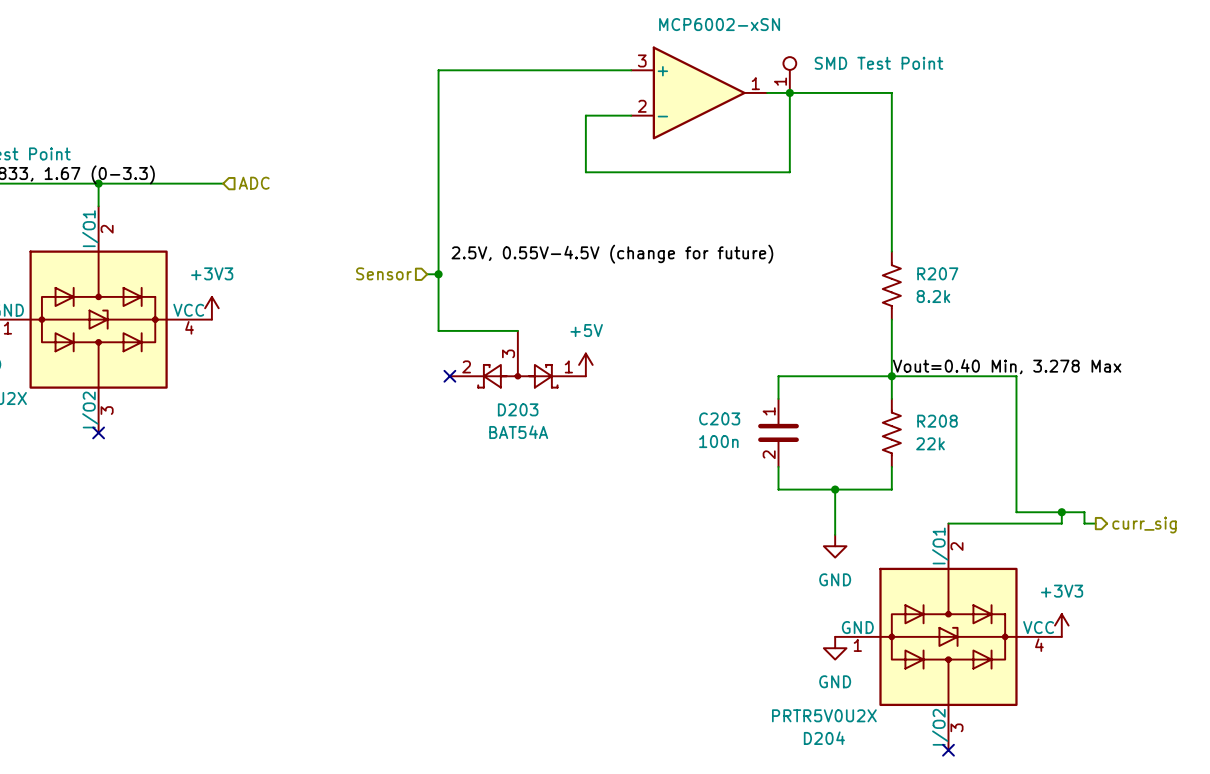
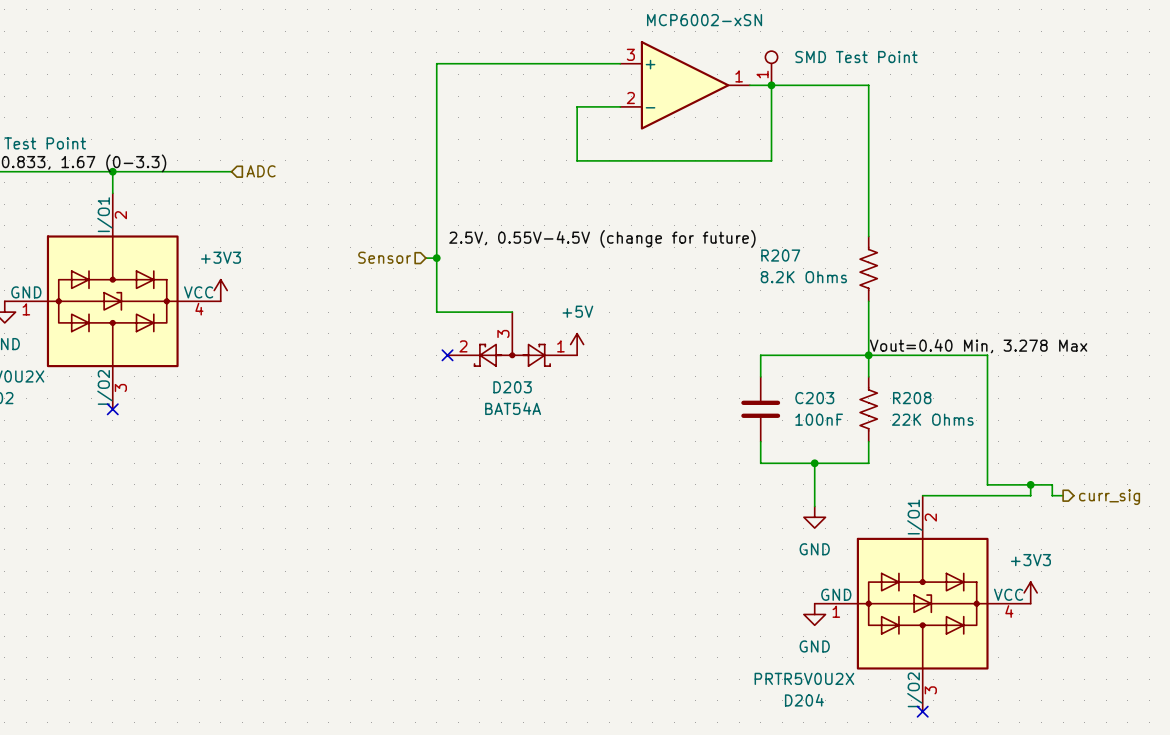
R207 name position: R207 (937, 273) -> R207 (780, 255)
R207 value: 8.2k (933, 296) -> 8.2K Ohms (803, 277)
C203 pin number: 1 (769, 411) -> none
C203 name position: C203 (719, 418) -> C203 (814, 398)
C203 value: 100n (718, 441) -> 100nF (819, 419)
R208 value: 22k (930, 443) -> 22K Ohms (932, 419)
C203 pin number: 2 (769, 454) -> none

